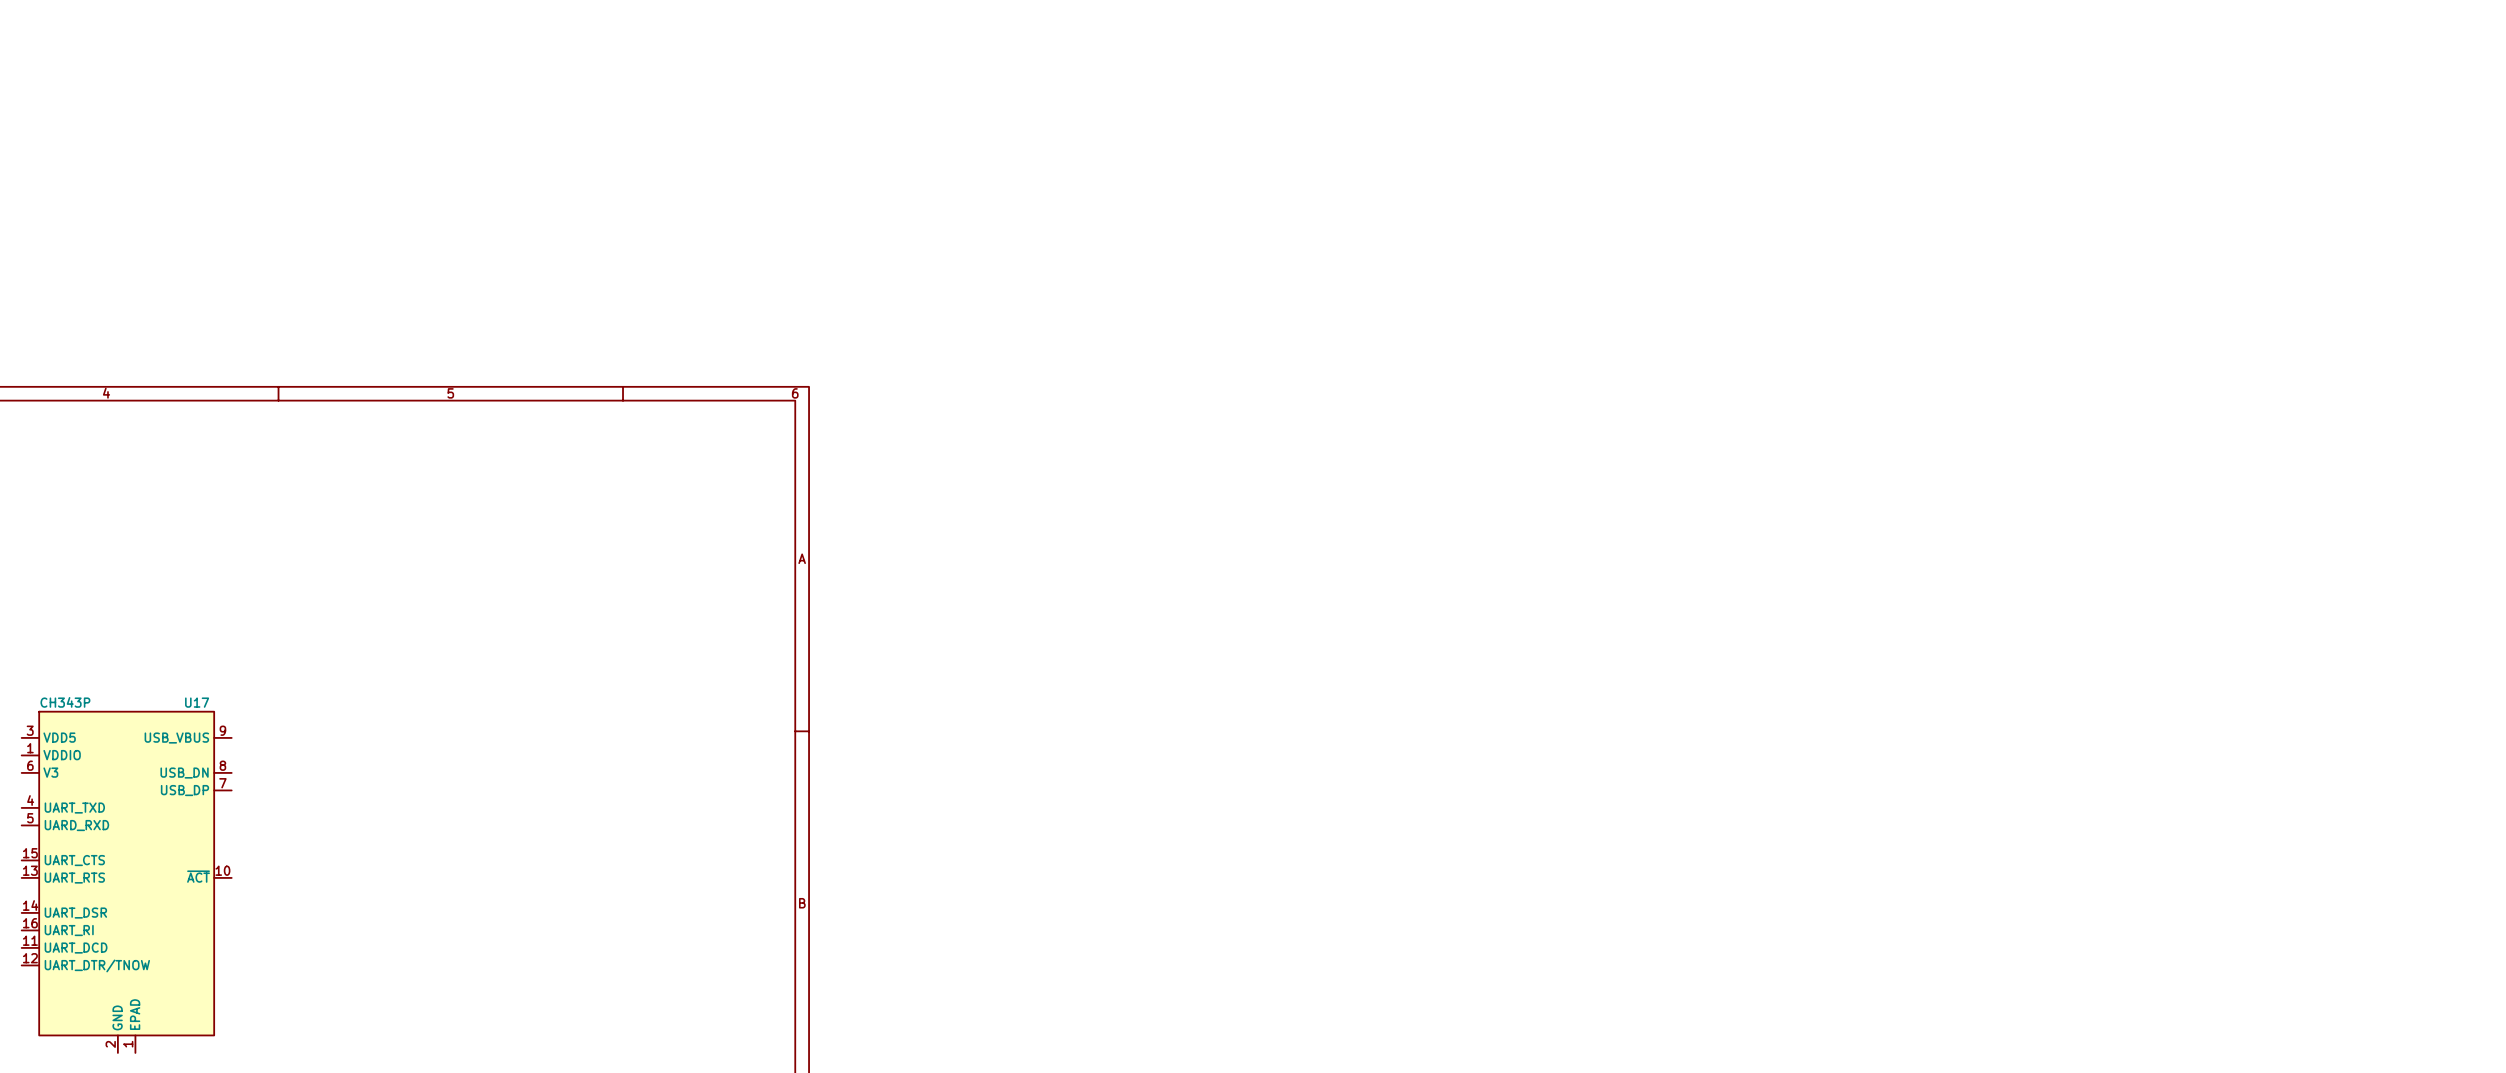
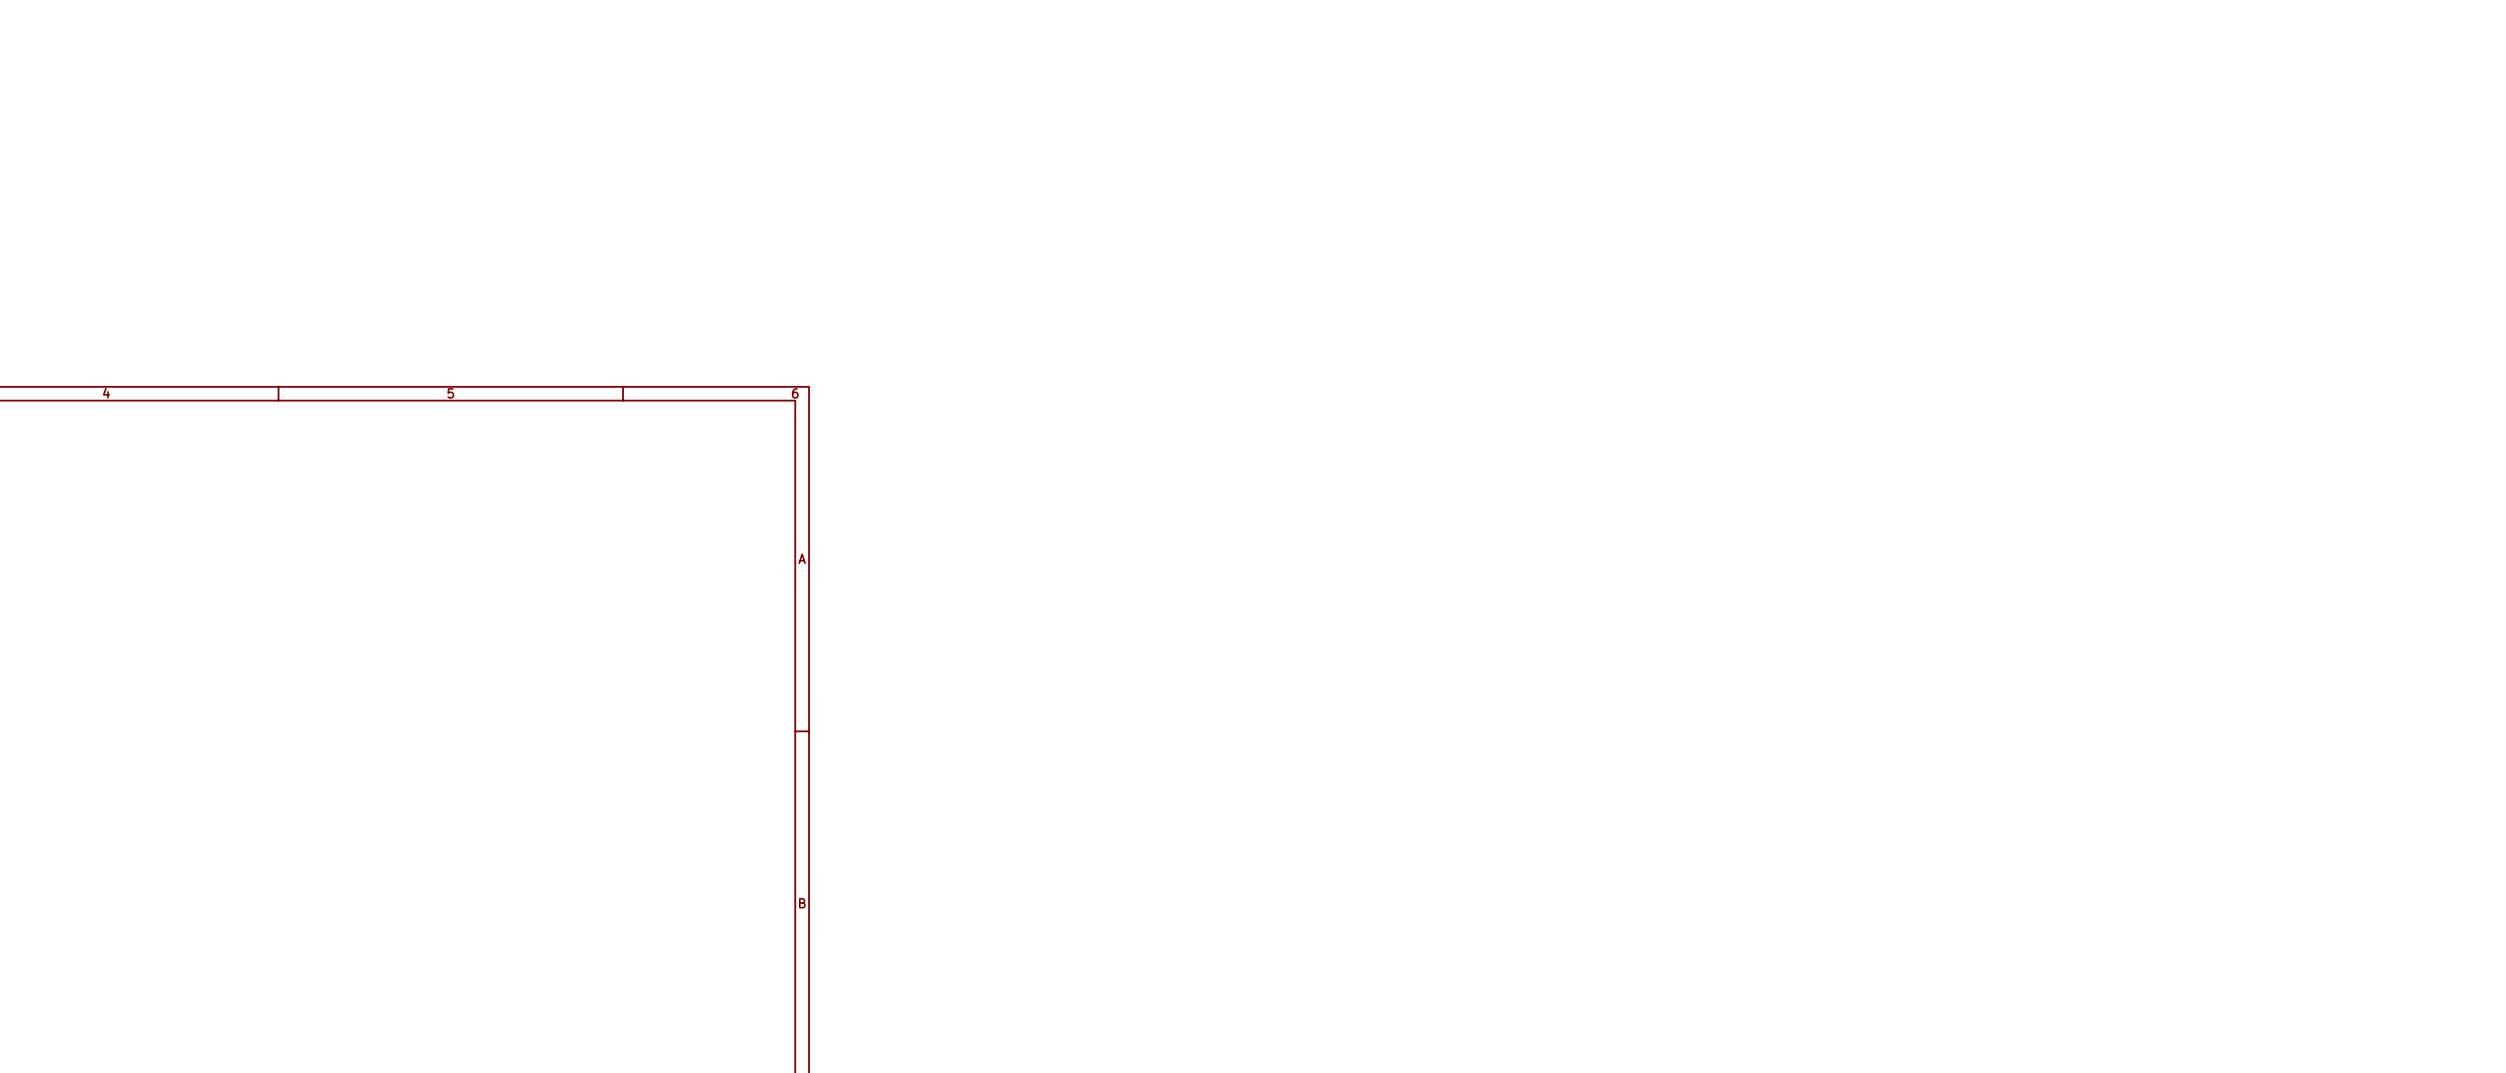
U17: CH343P (1255, 536) -> none

